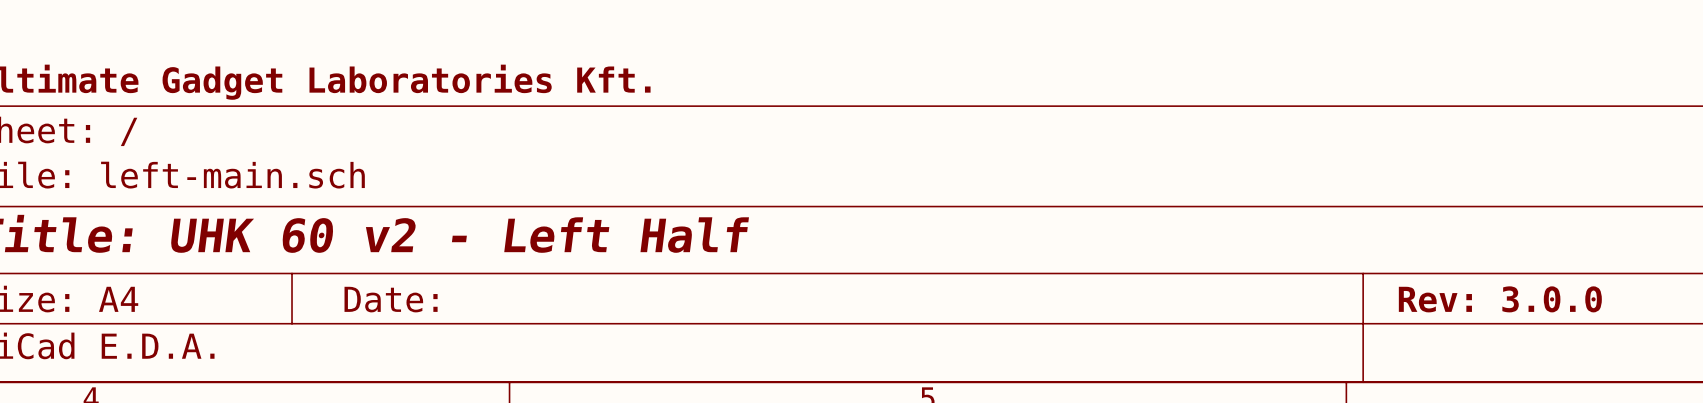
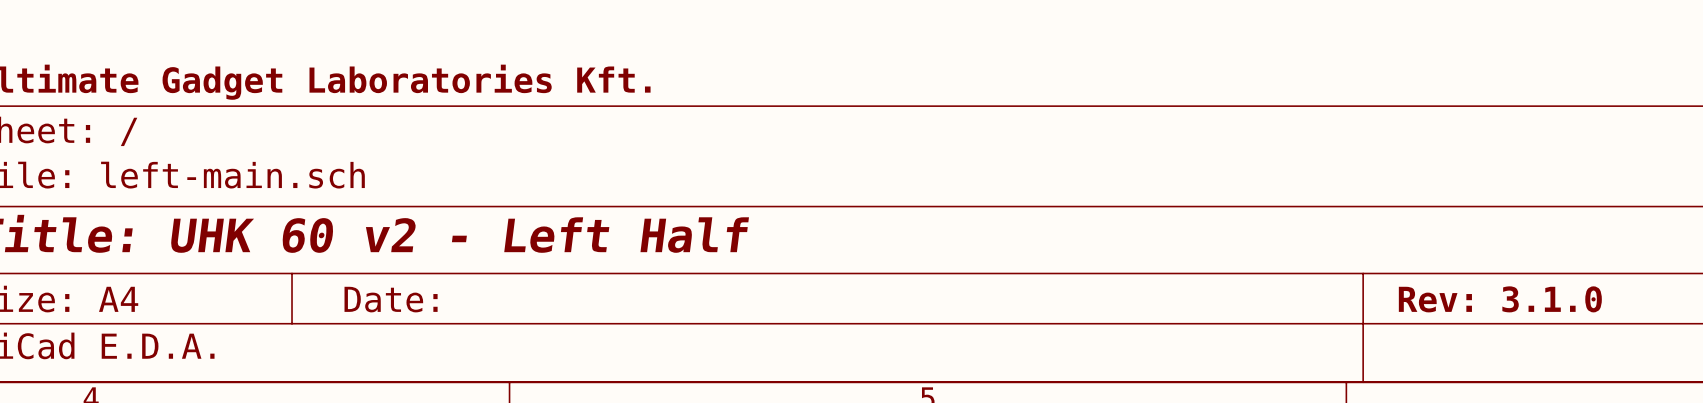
title block: Rev: 3.0.0 (1500, 299) -> Rev: 3.1.0 (1500, 299)

